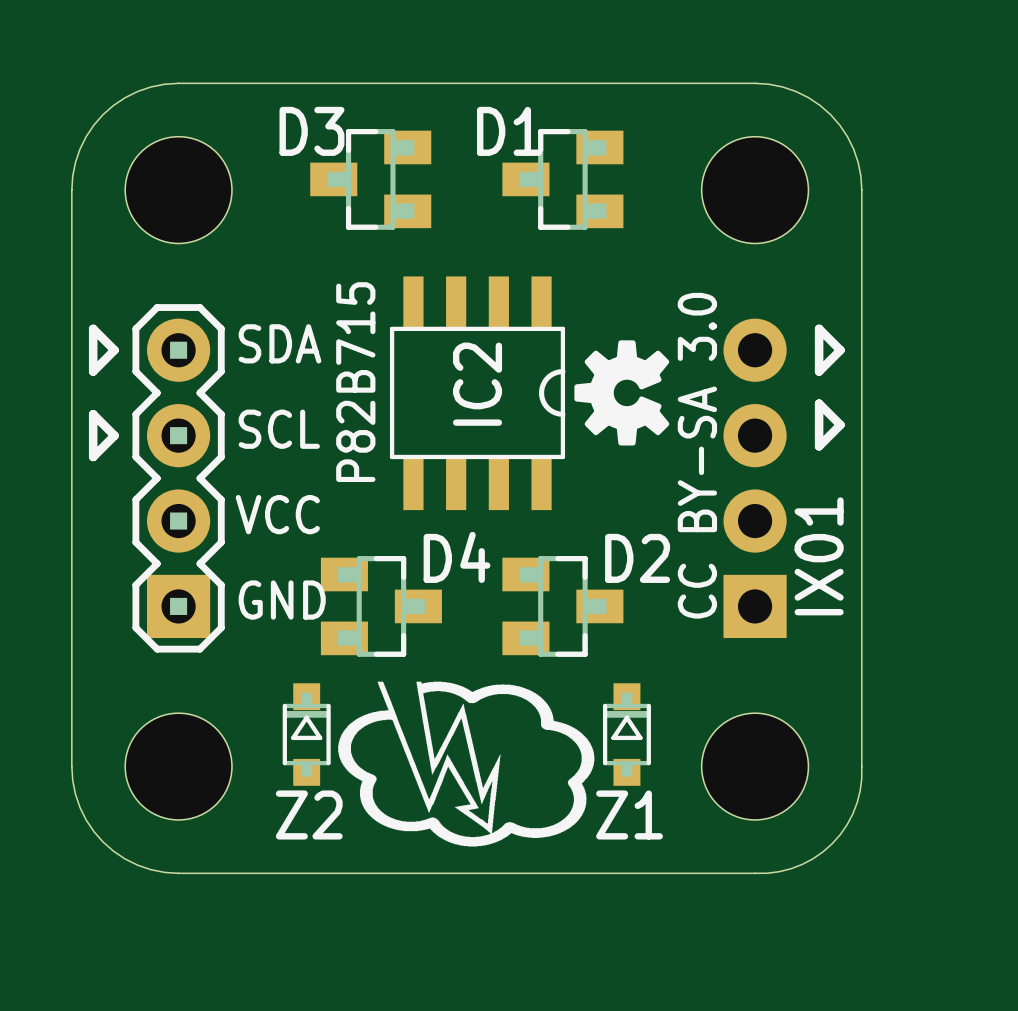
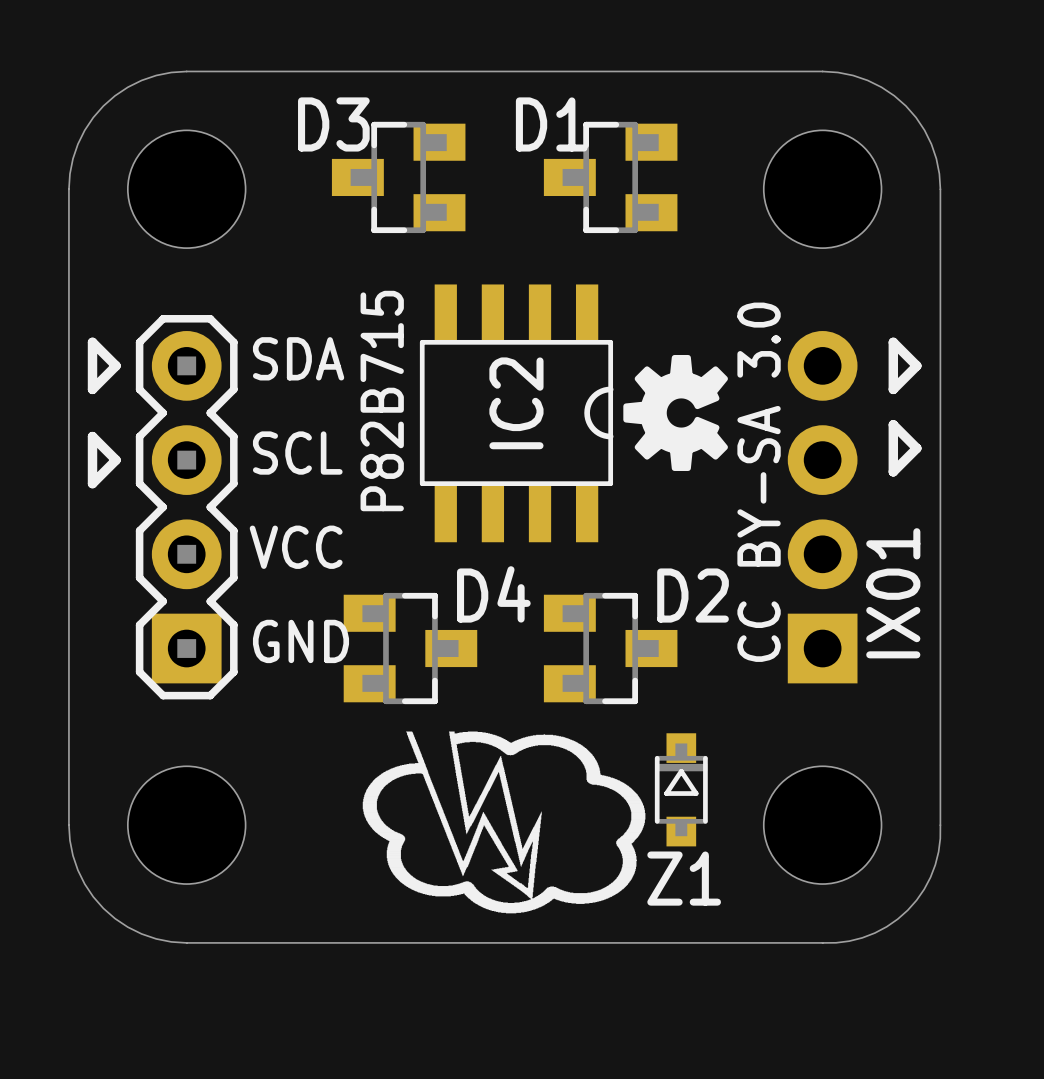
Z2: (306, 734) -> none

